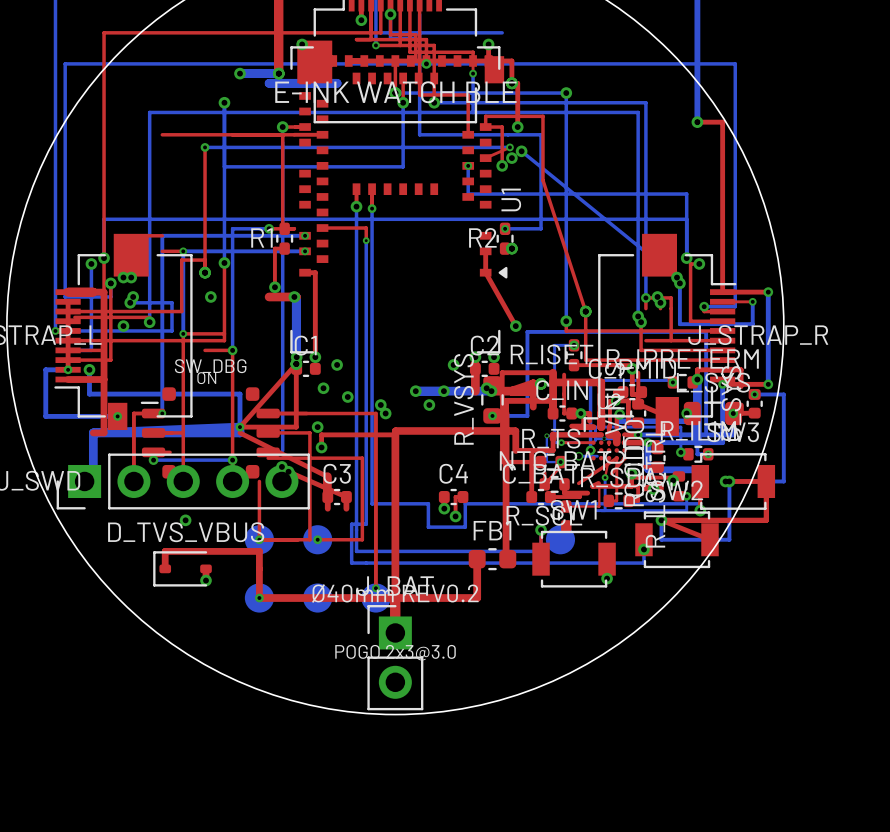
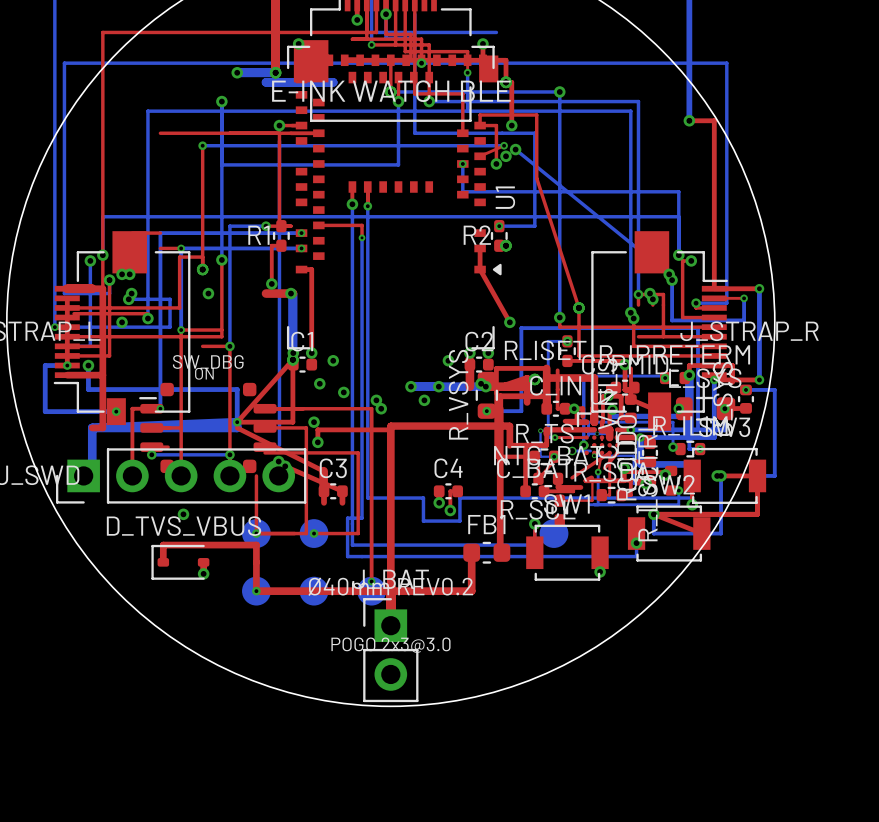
bottom track: none -> (594, 455) (633, 455) (633, 483) (646, 483)
via: none -> (594, 455)

